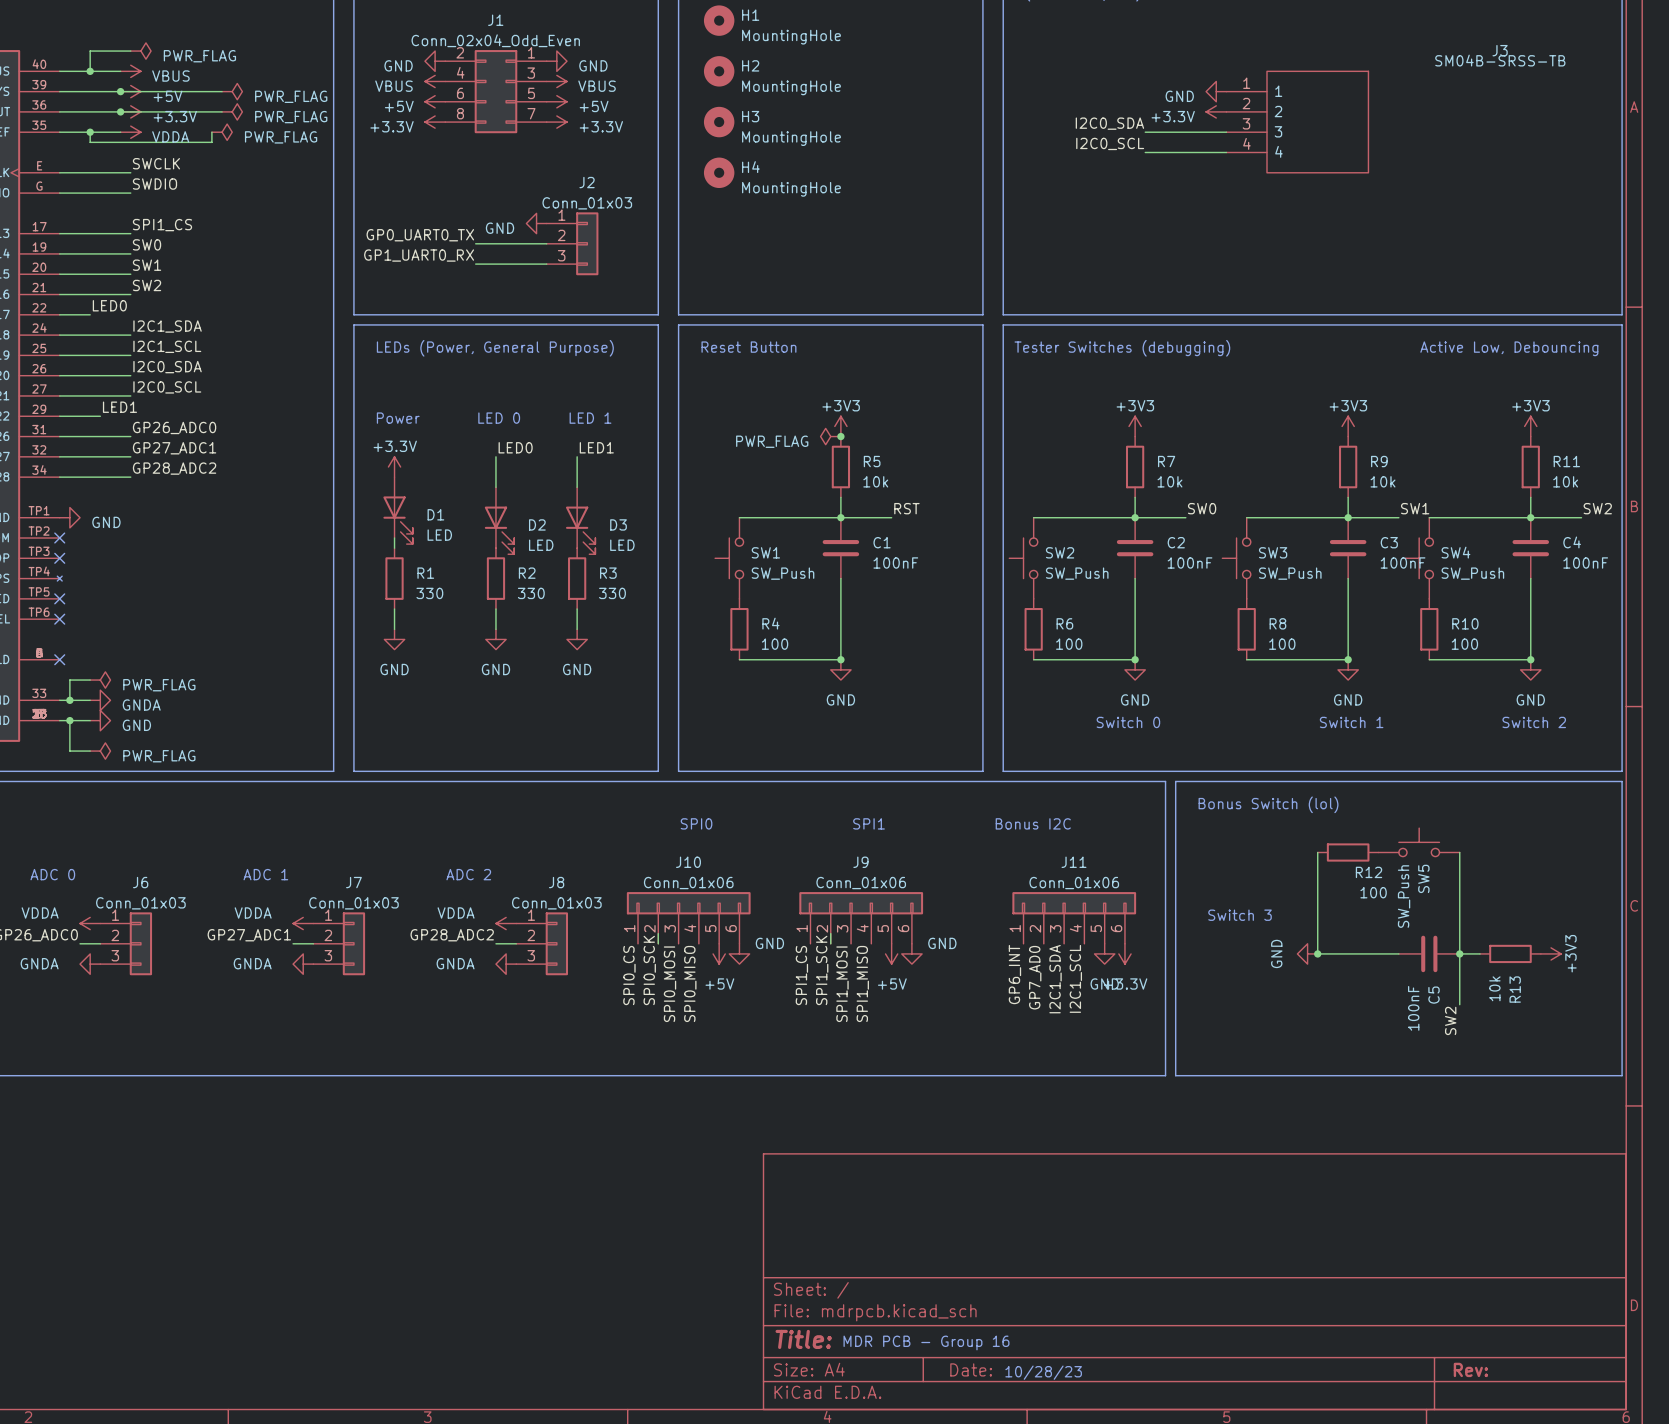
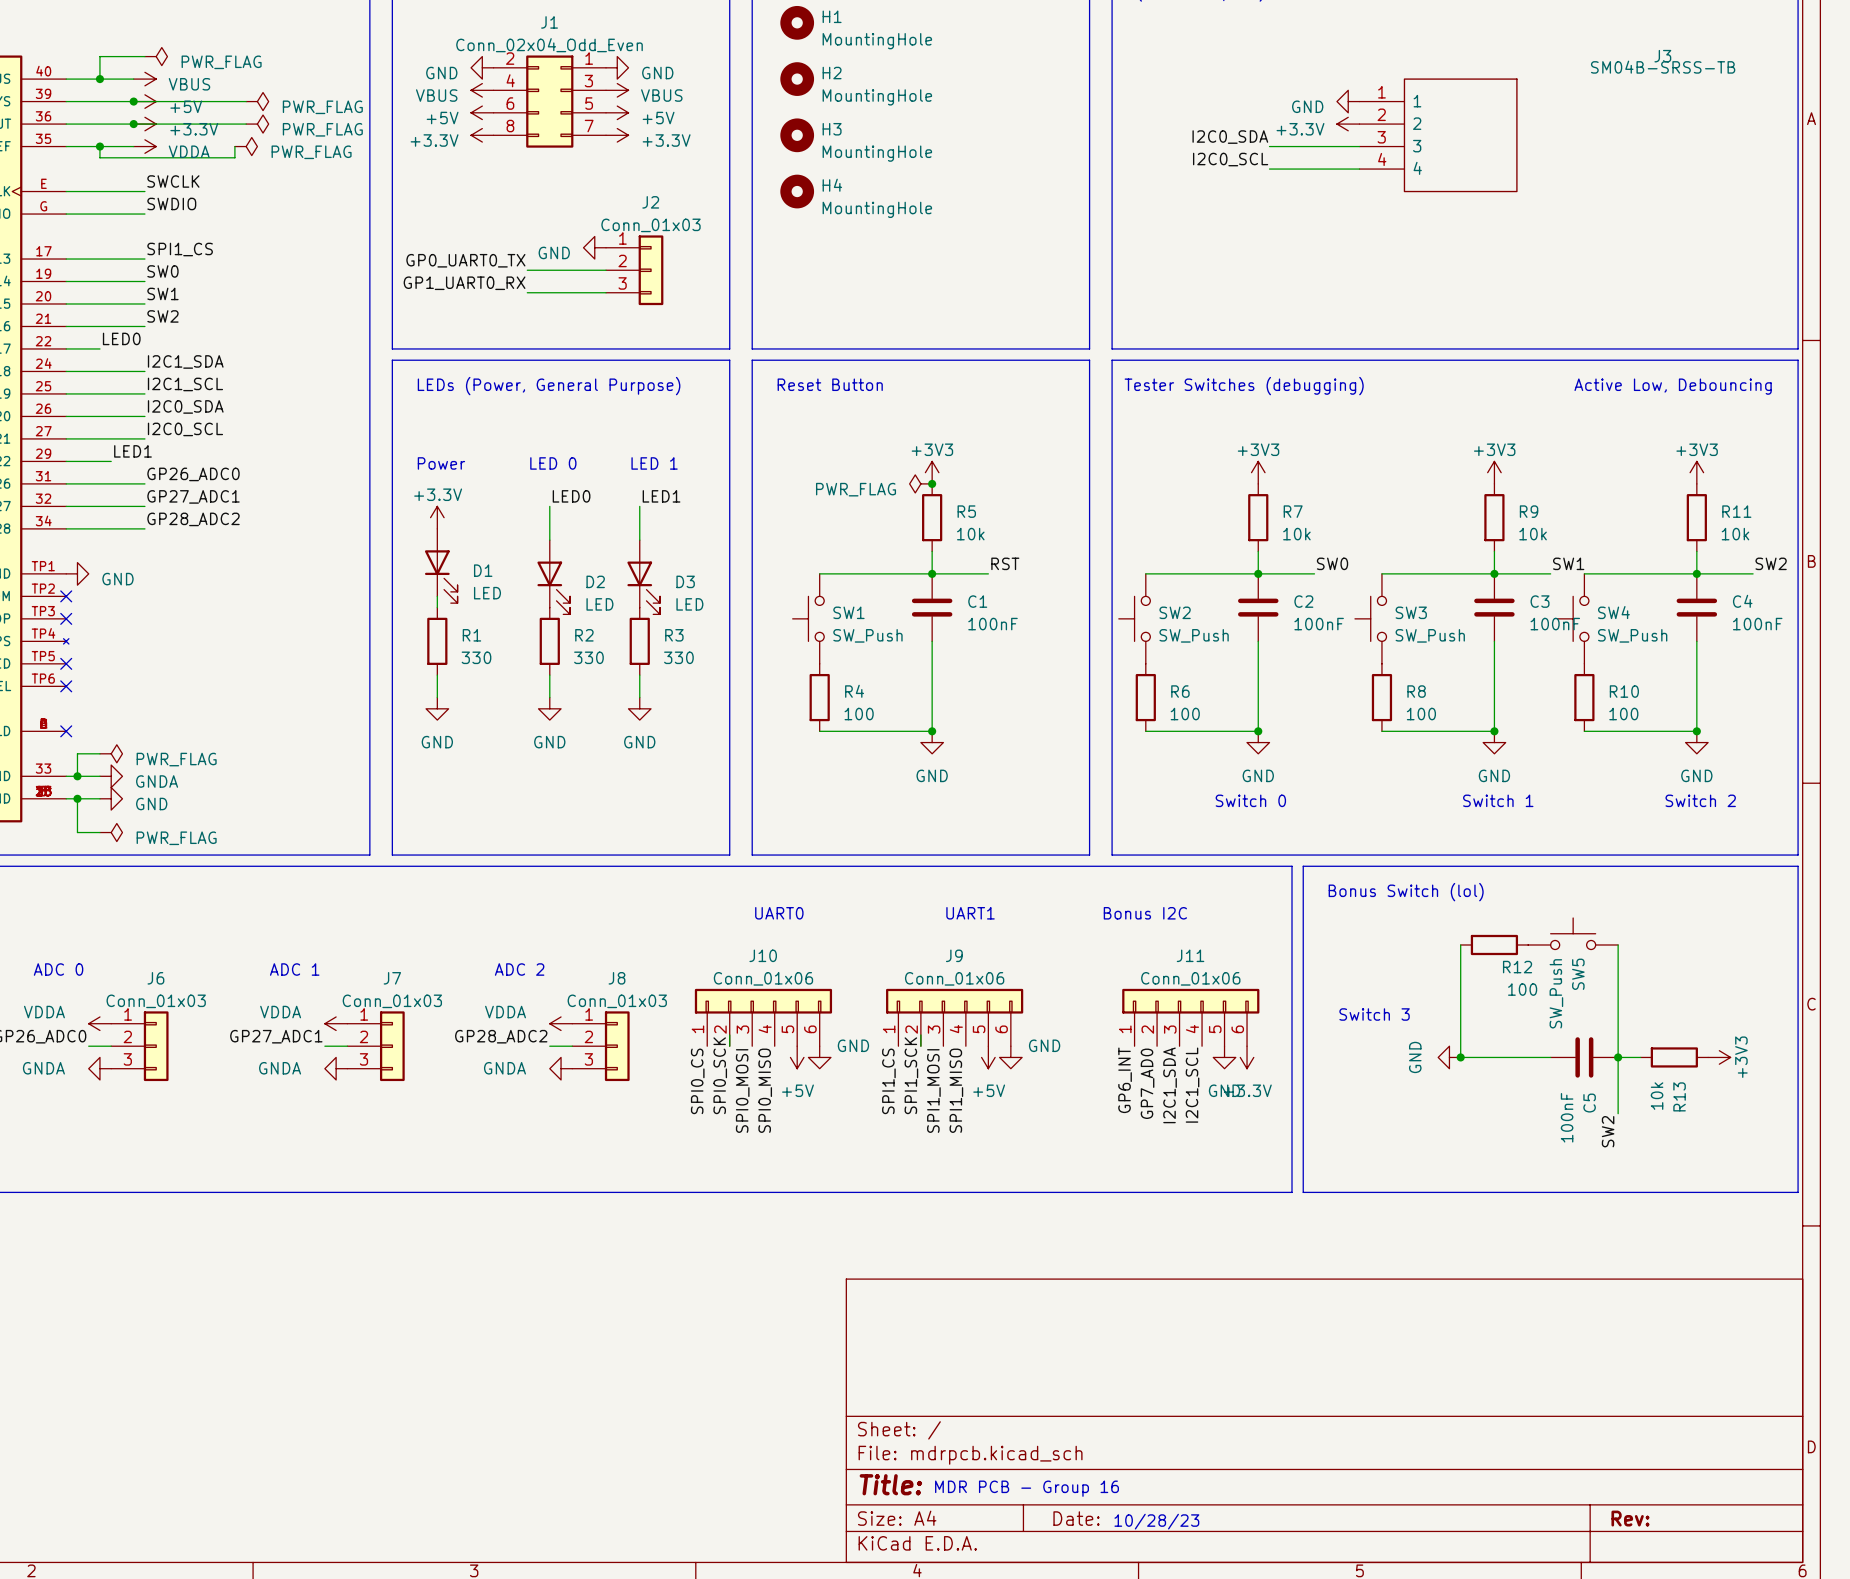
text: SPI0 (696, 823) -> UART0 (779, 913)
text: SPI1 (869, 823) -> UART1 (970, 913)

